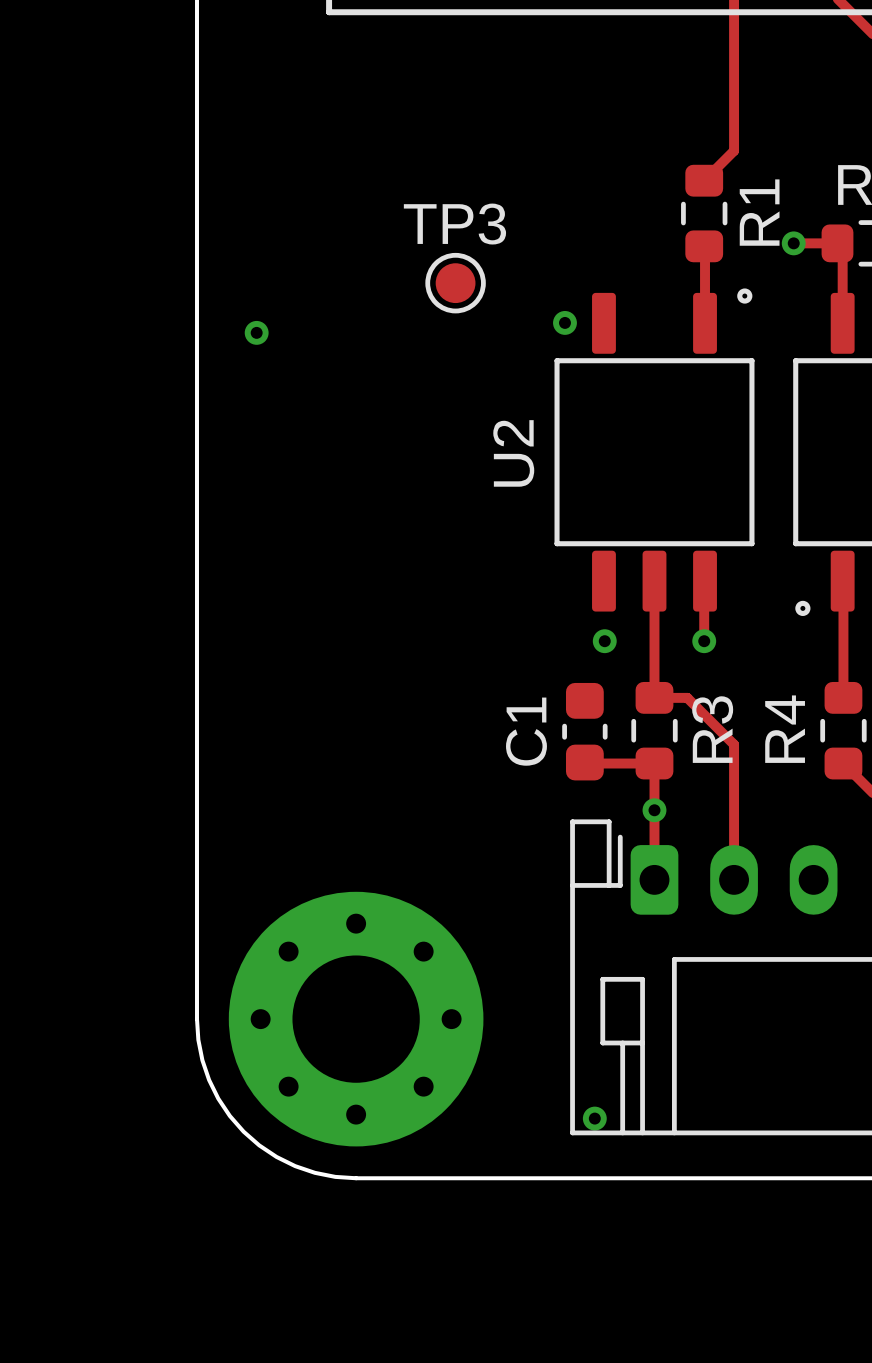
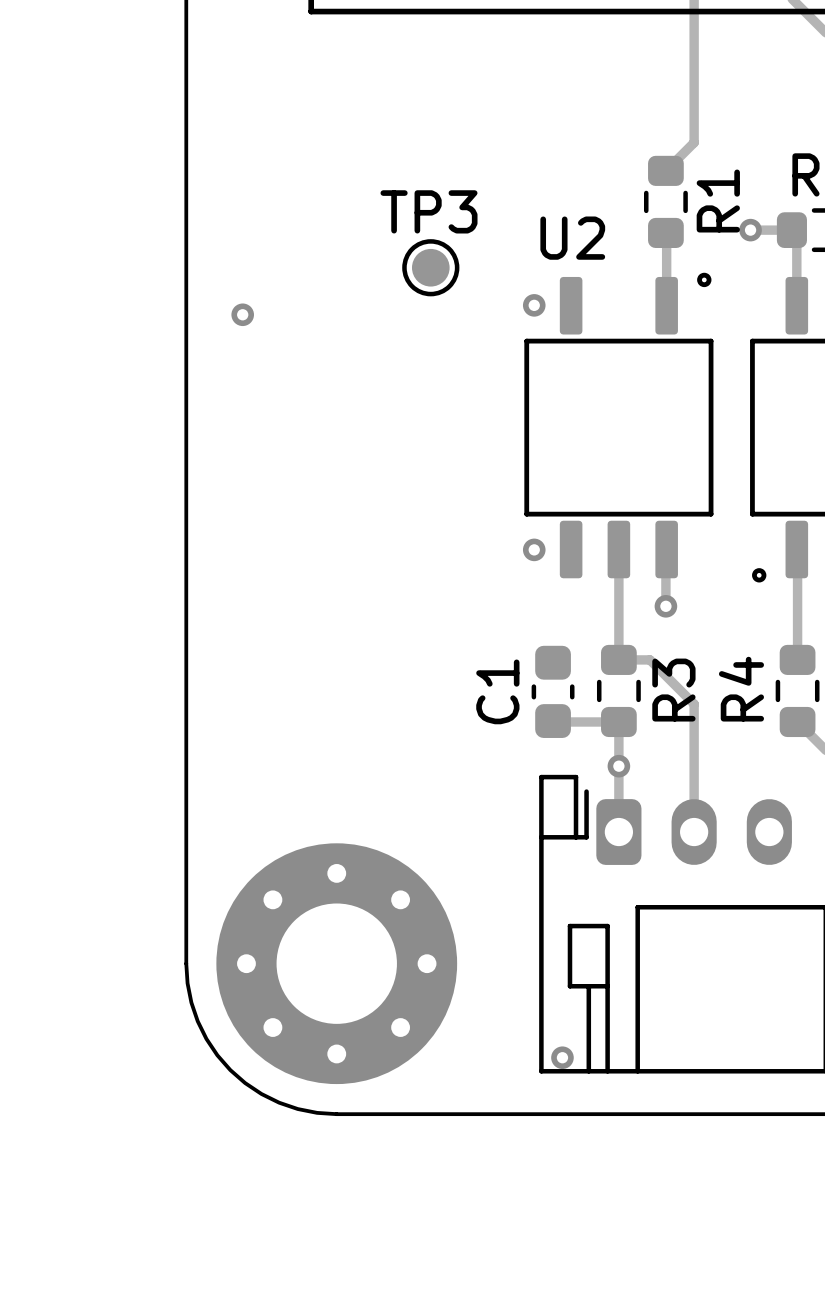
U2 name rotation: 0° (513, 453) -> 90° clockwise (572, 238)
U2 name position: U2 (513, 453) -> U2 (572, 238)
via position: (604, 641) -> (534, 549)

